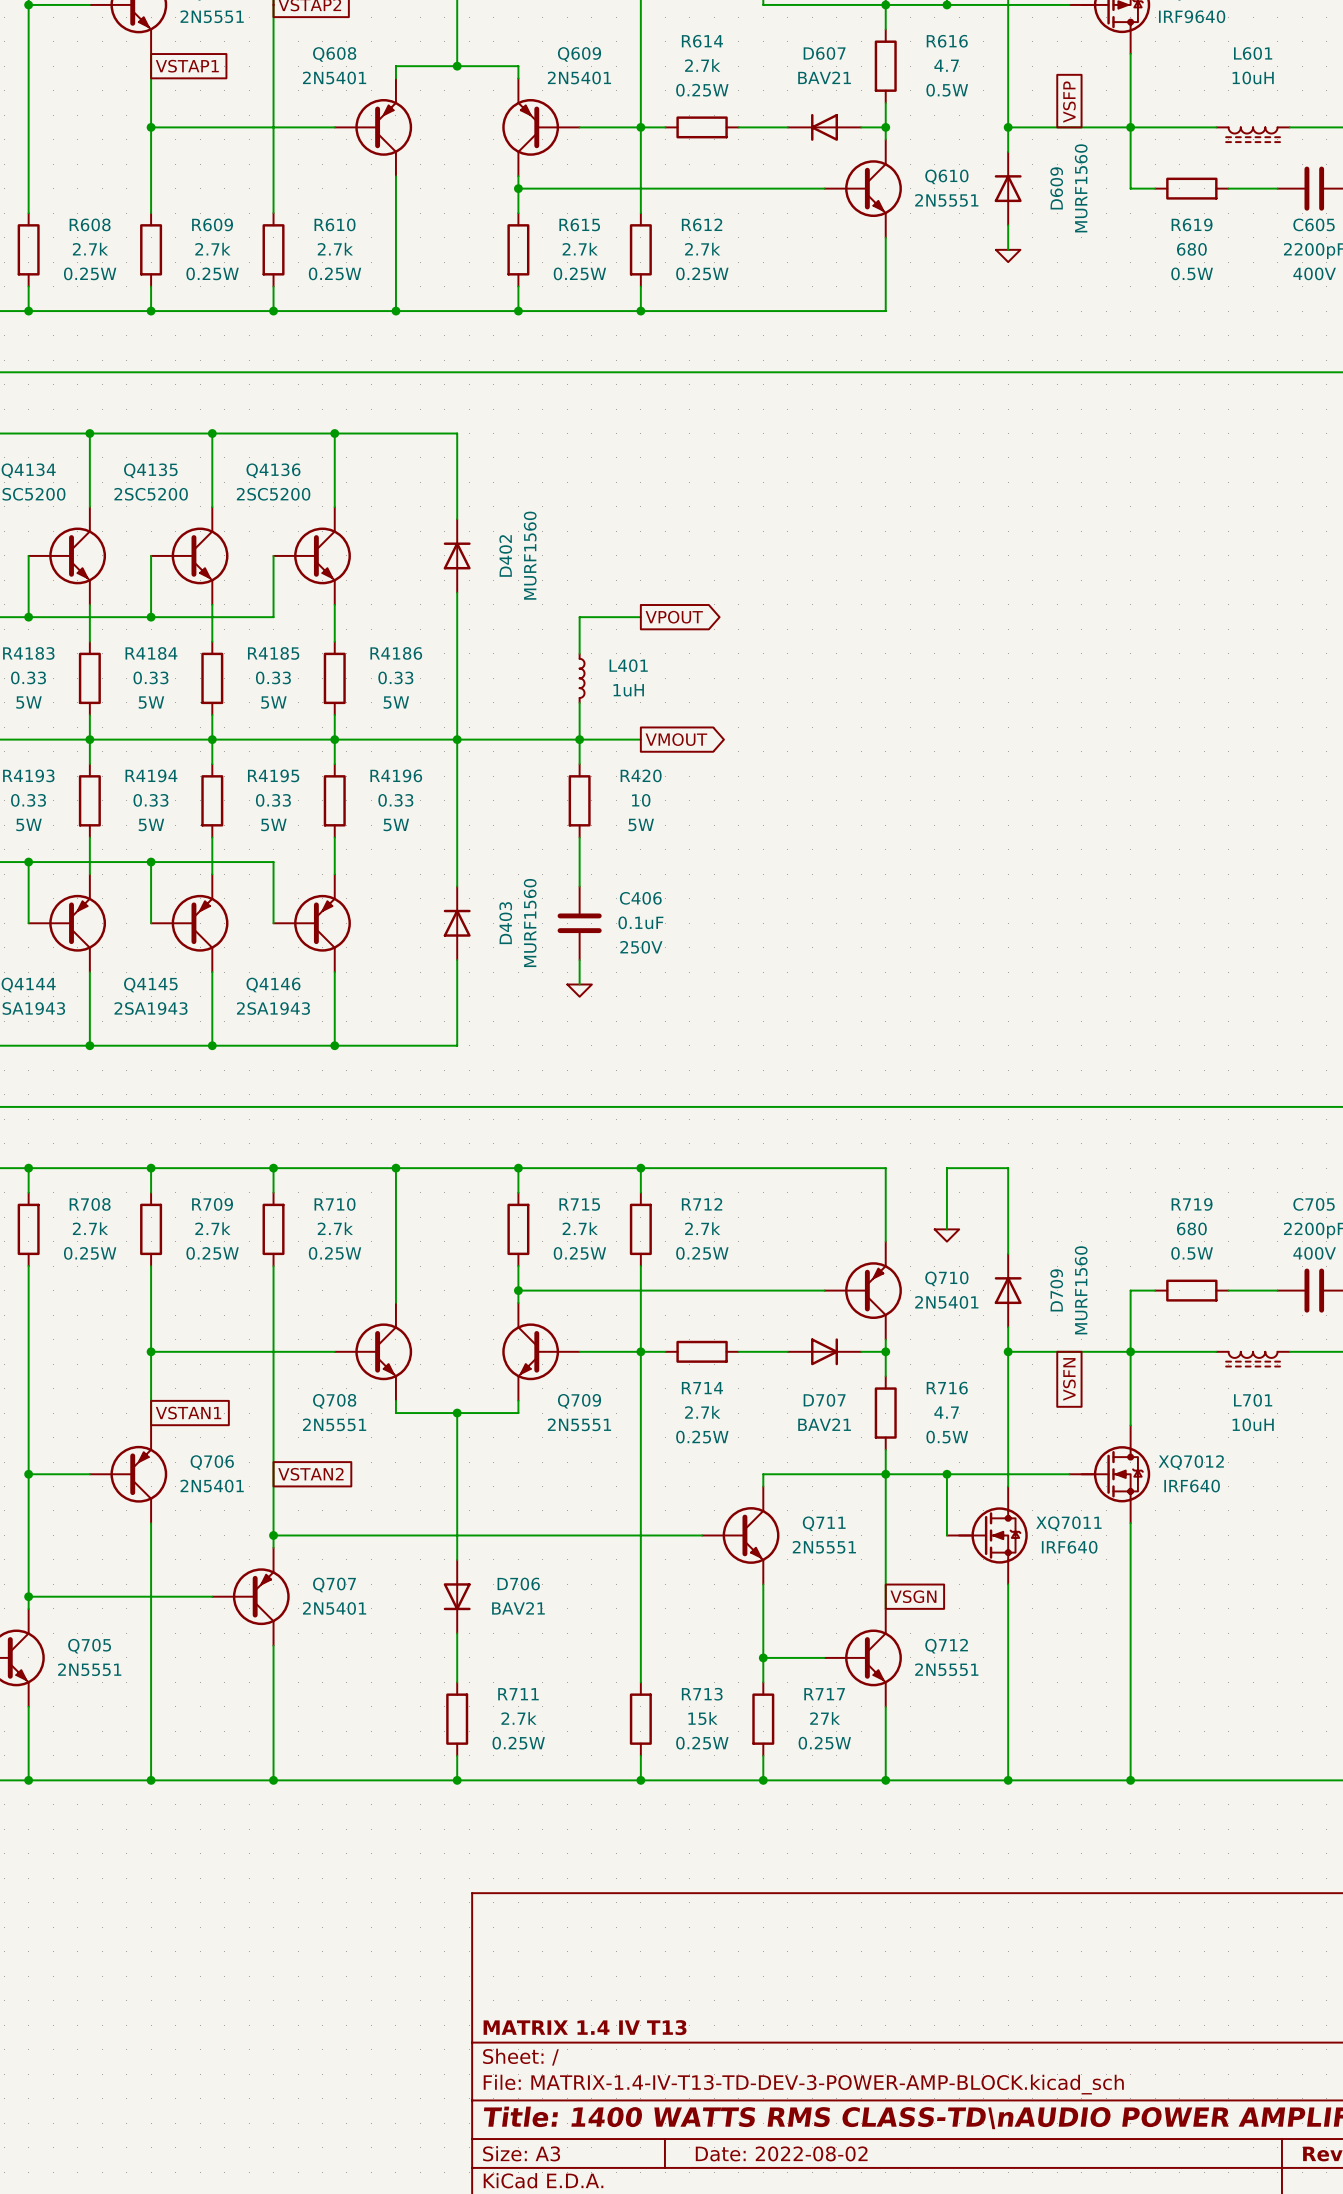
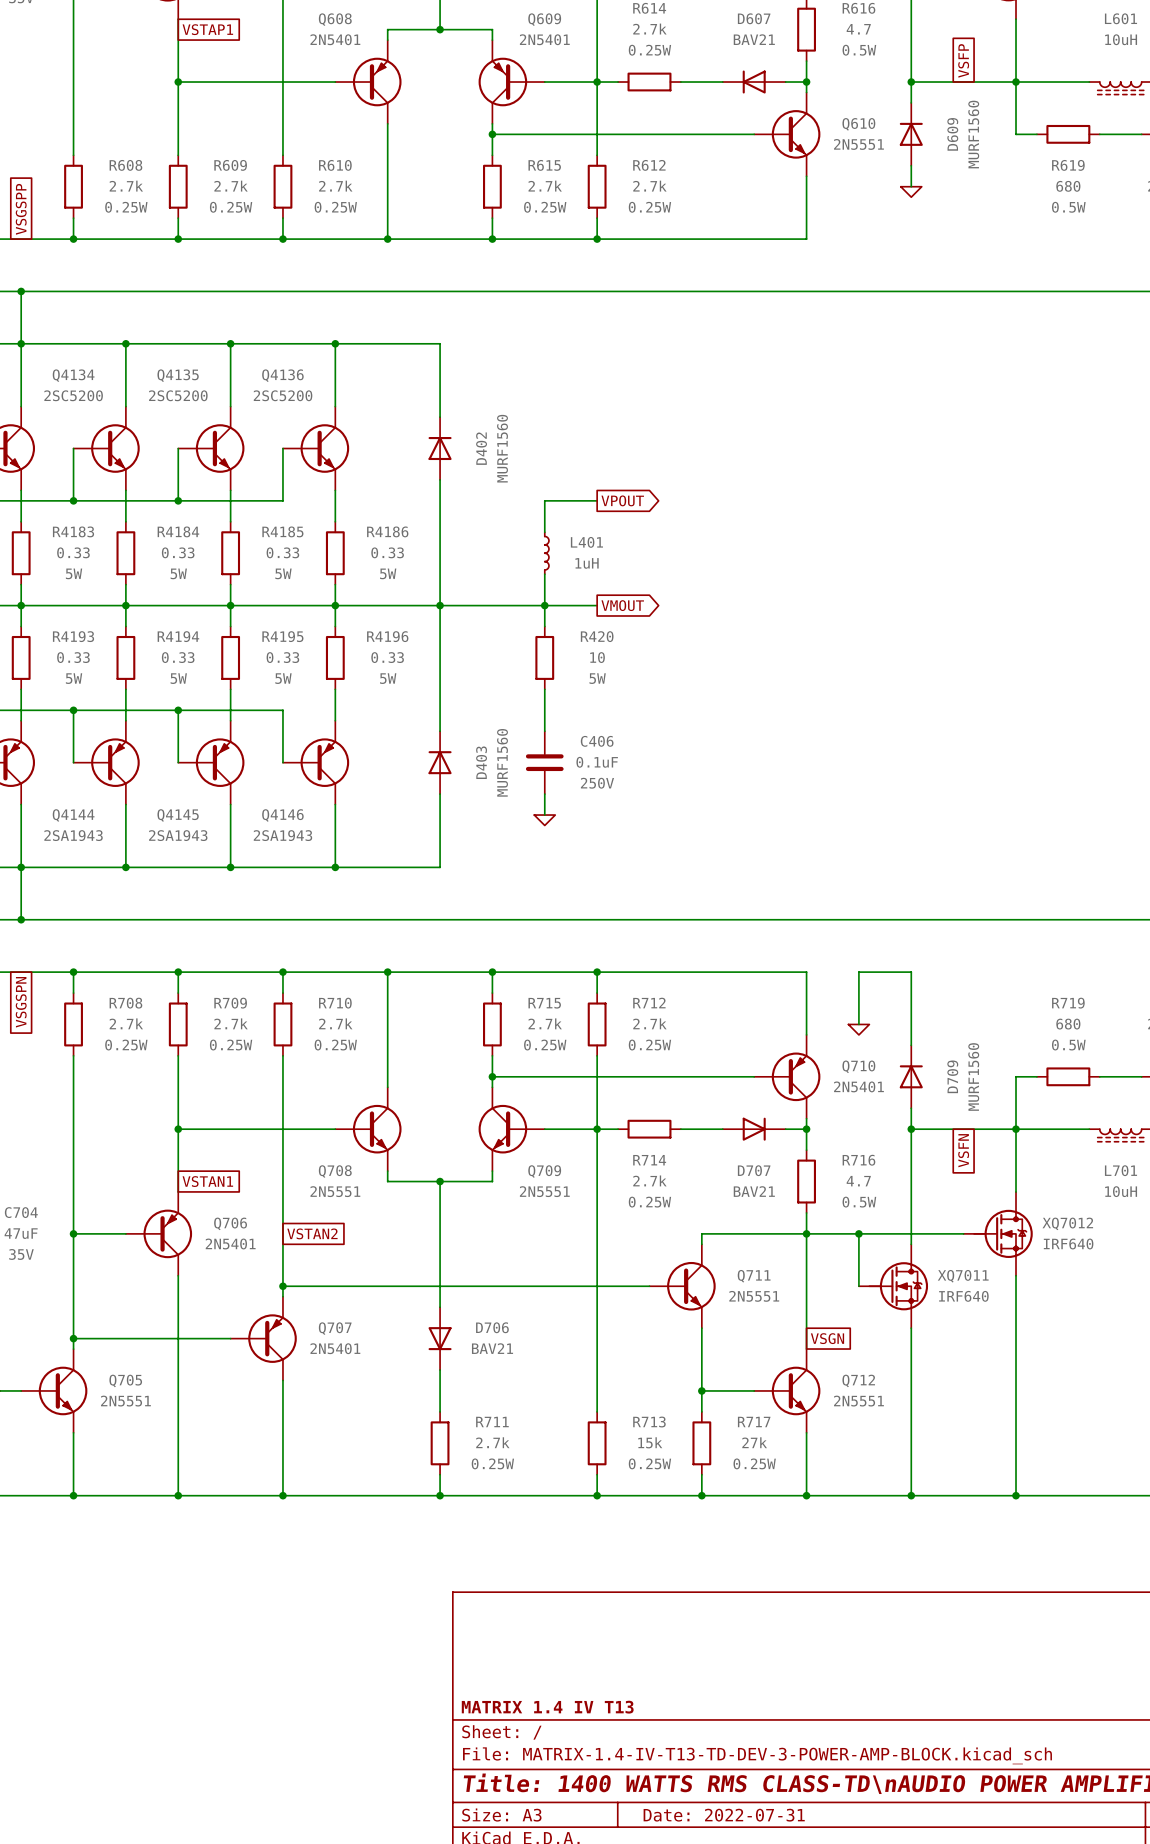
title block: Date: 2022-08-02 (781, 2153) -> Date: 2022-07-31 (724, 1815)

